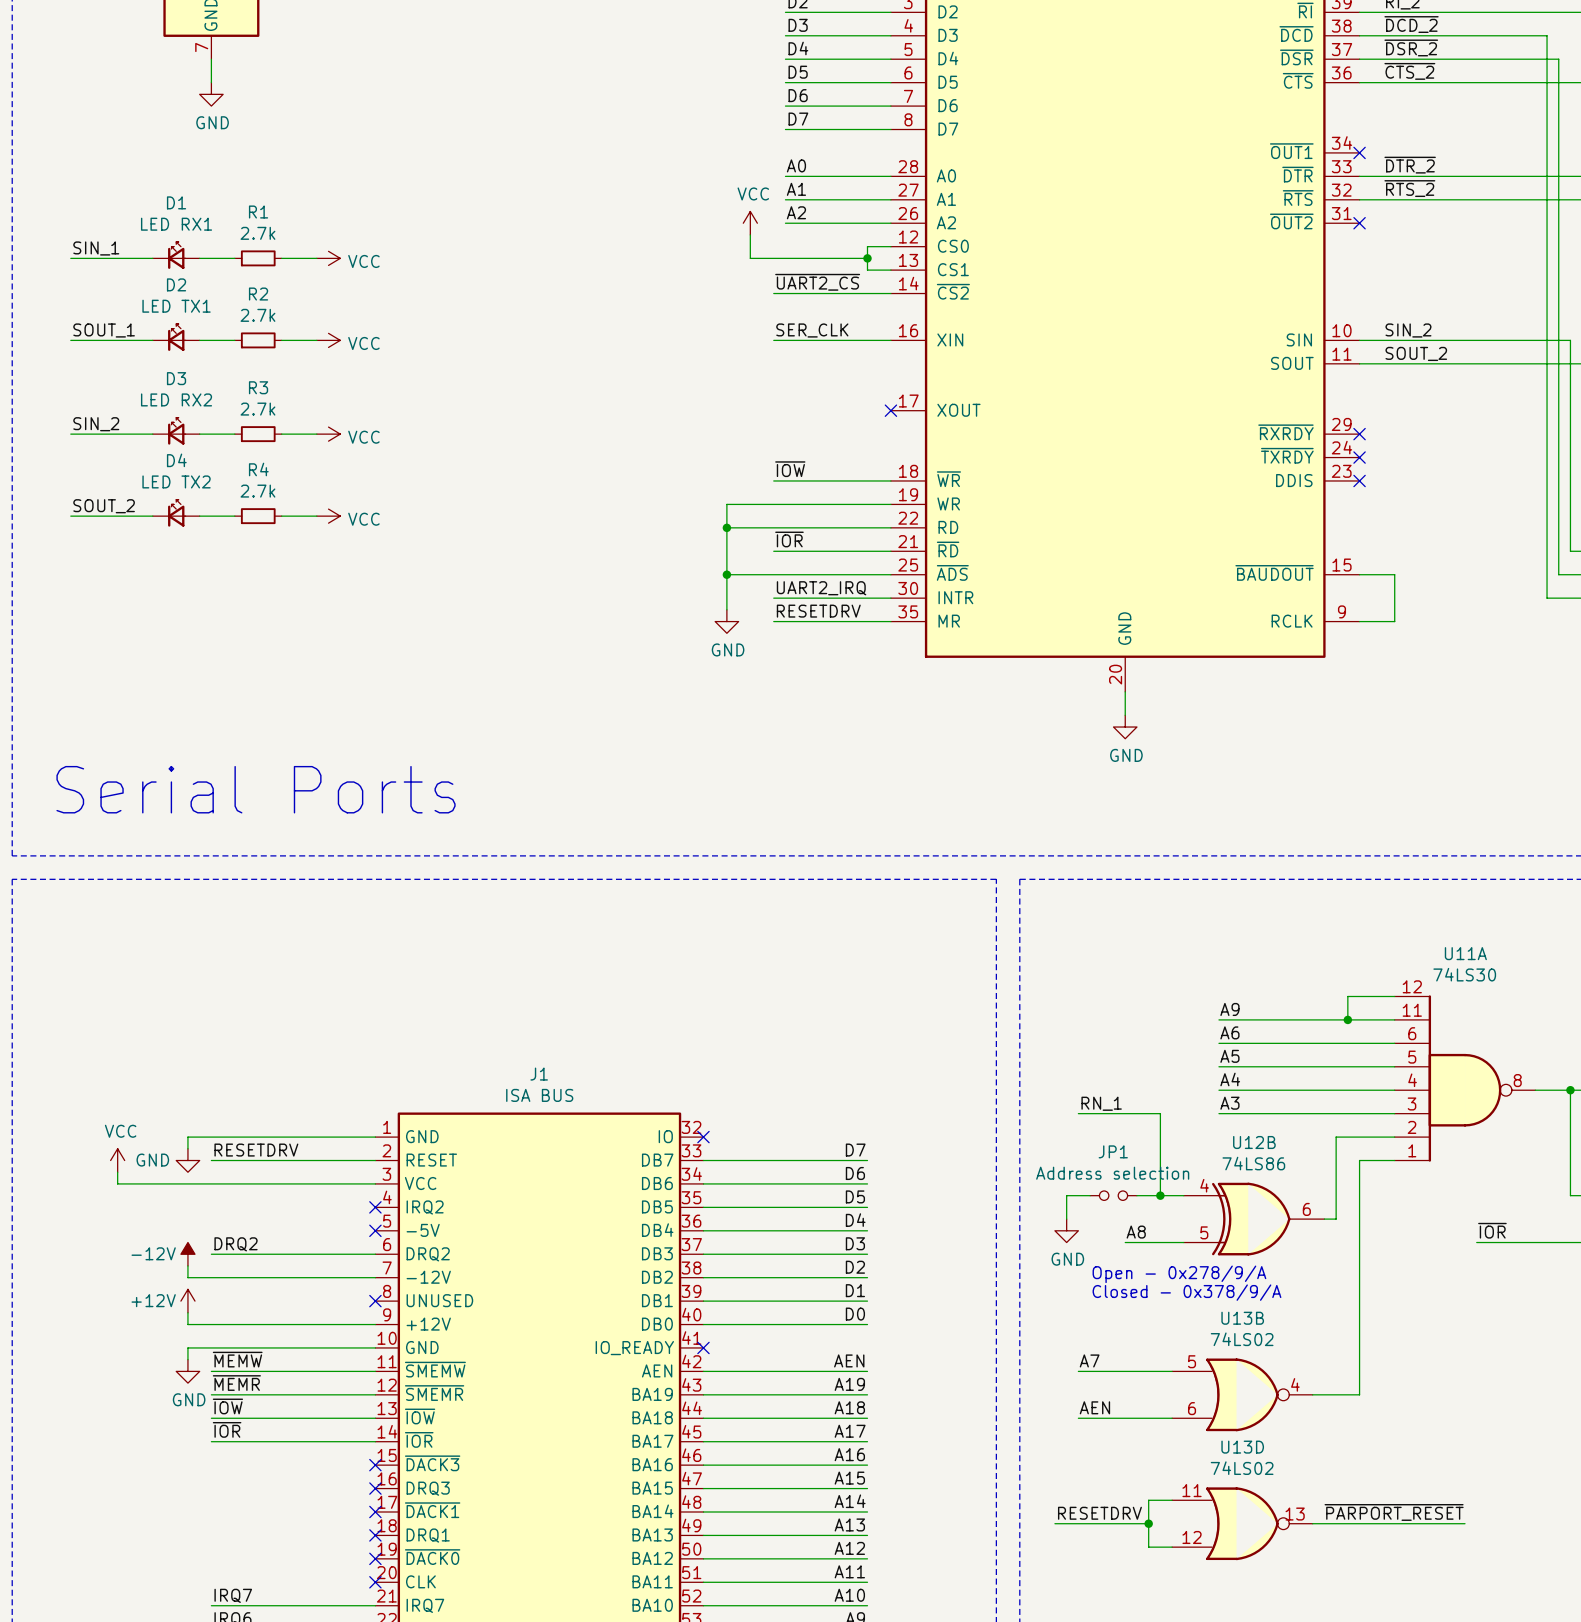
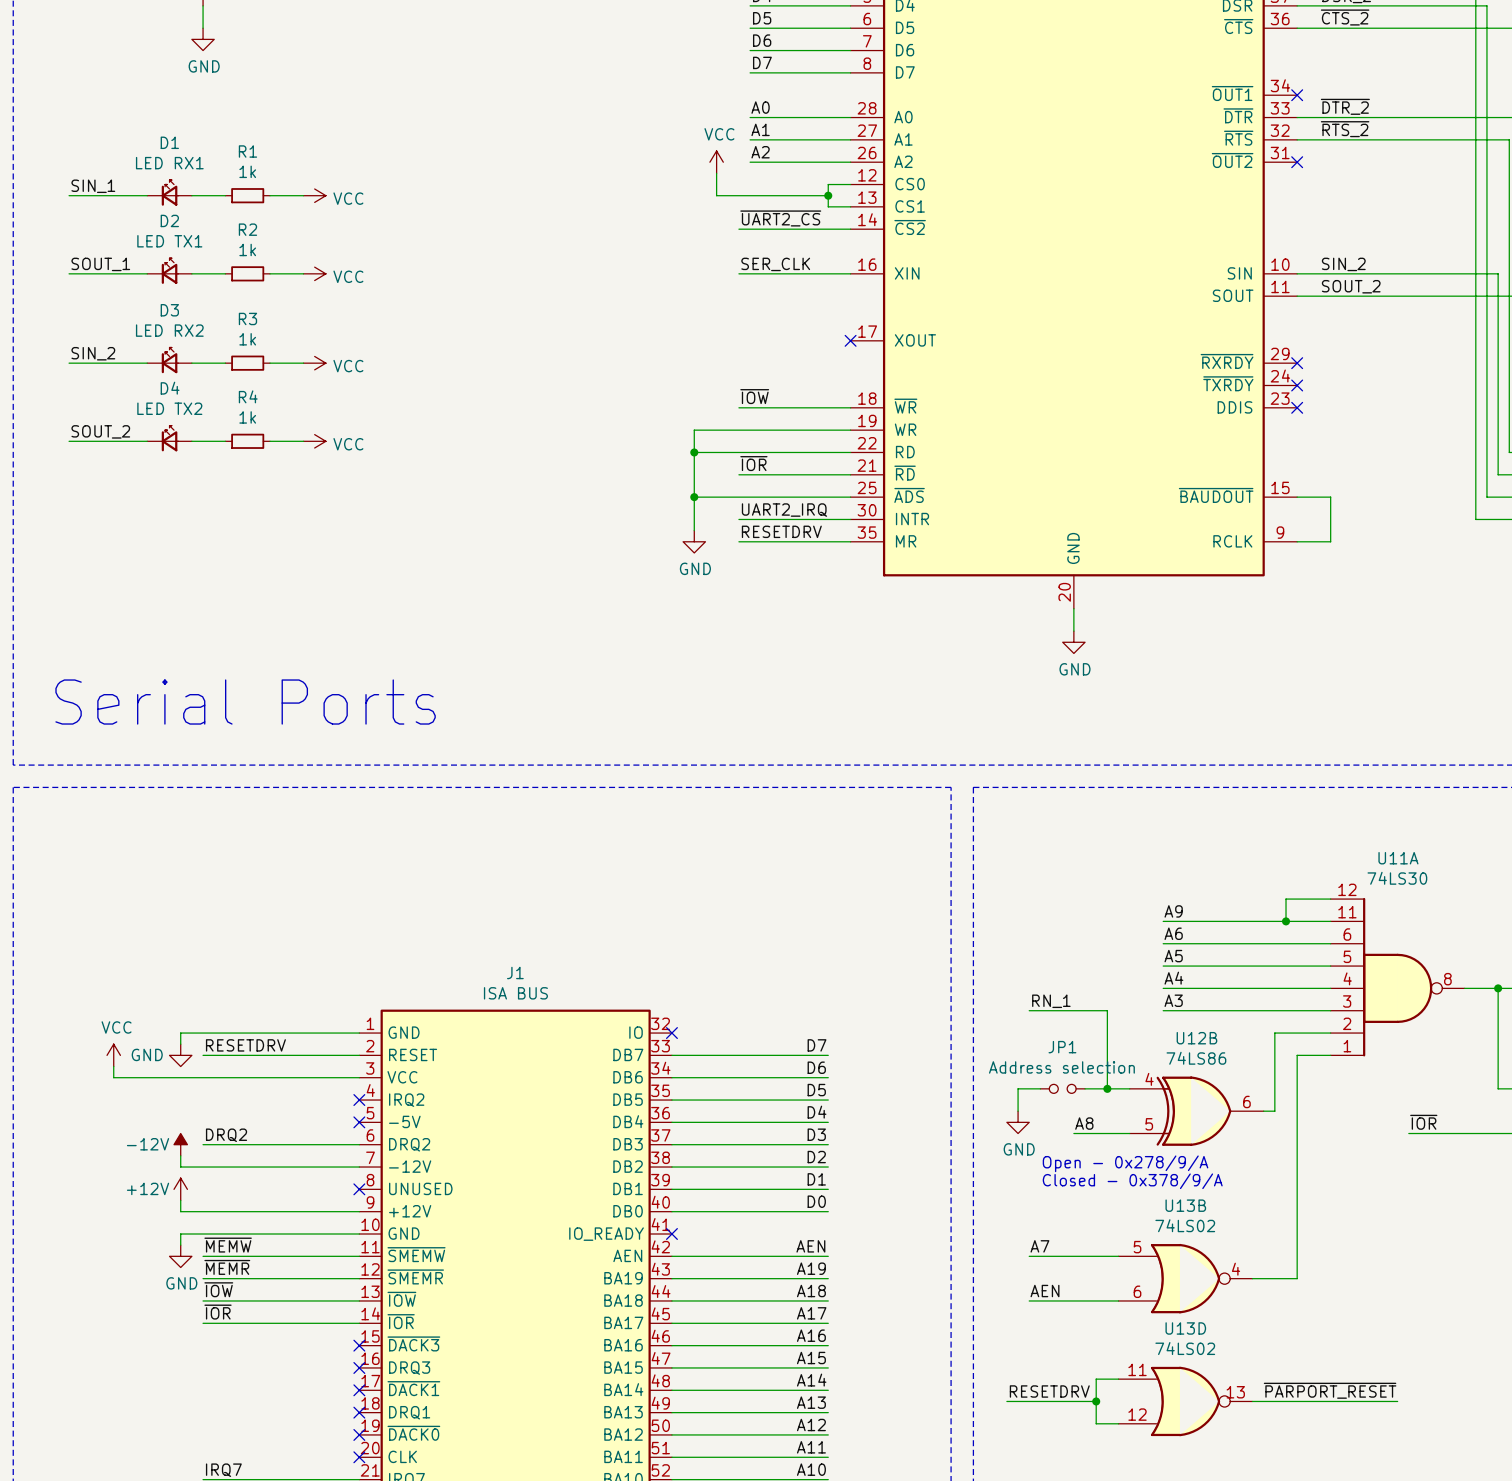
R1 value: 2.7k (257, 233) -> 1k (247, 171)
R2 value: 2.7k (257, 315) -> 1k (247, 249)
R3 value: 2.7k (257, 409) -> 1k (247, 339)
R4 value: 2.7k (257, 491) -> 1k (247, 417)

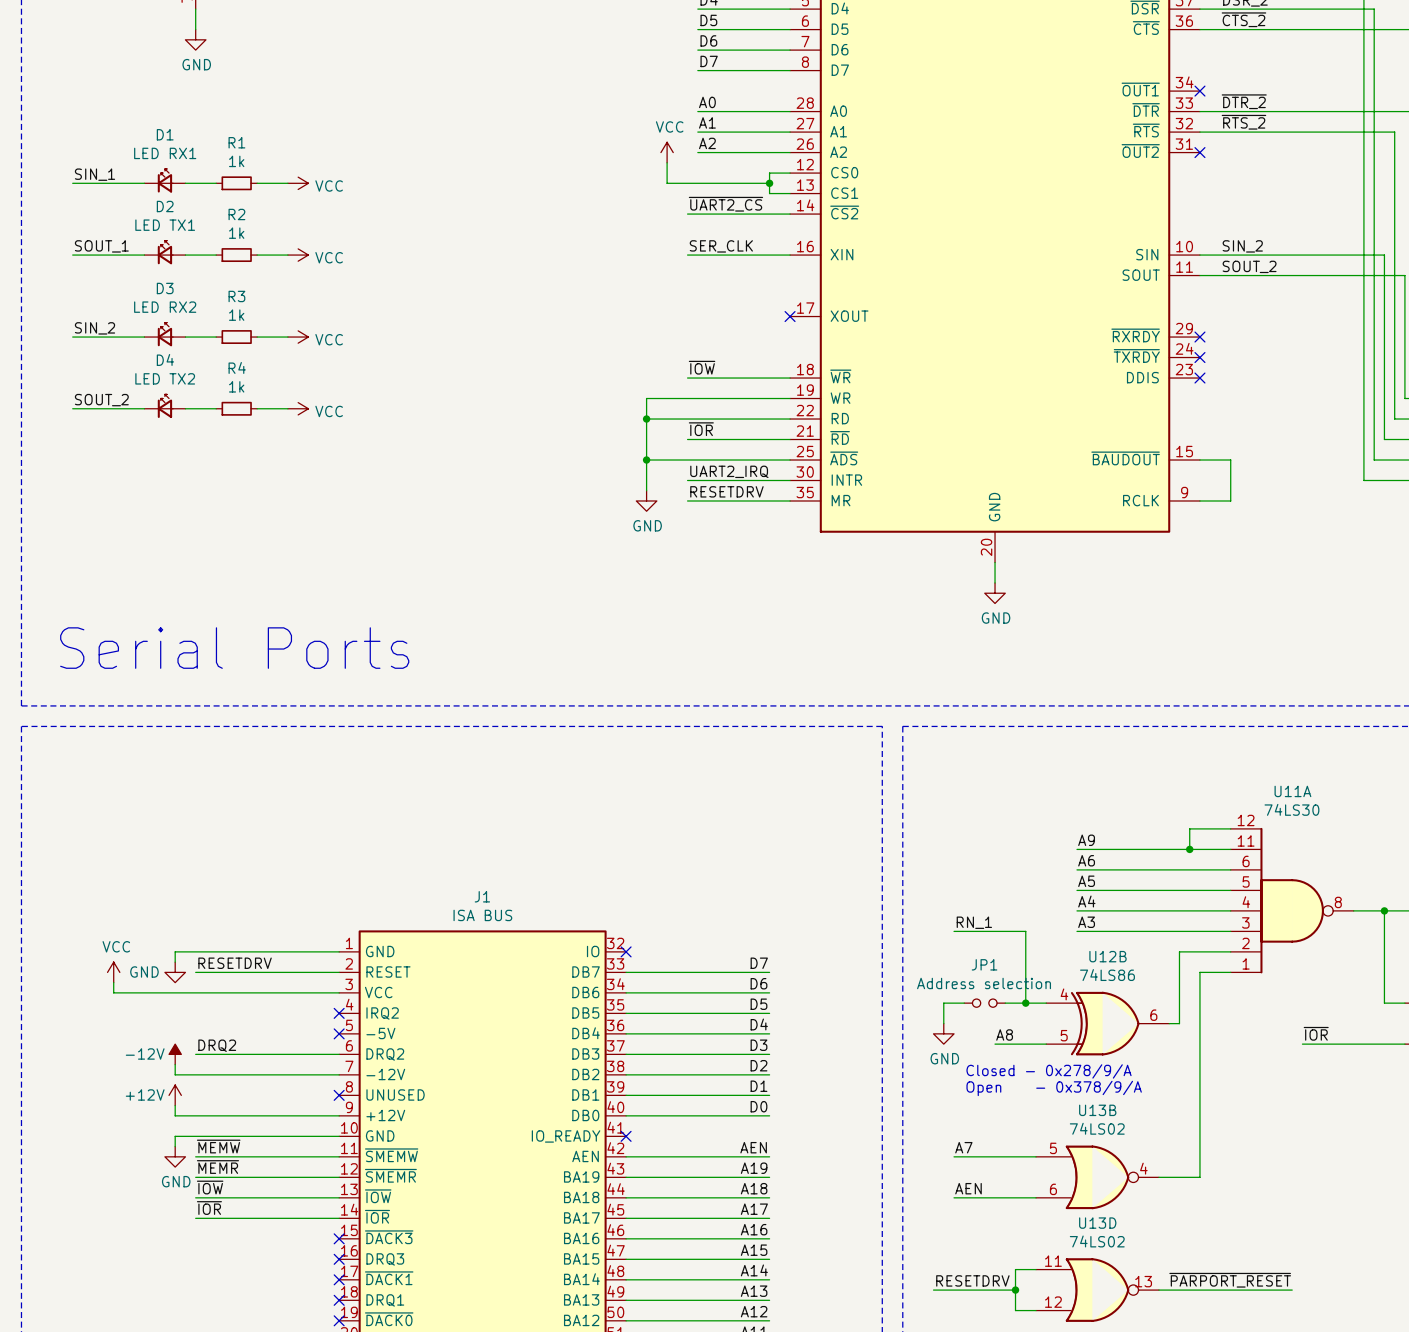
text: Open - 0x278/9/A (1125, 1163) -> Closed - 0x278/9/A (1049, 1071)
text: Closed - 0x378/9/A (1132, 1181) -> Open - 0x378/9/A (1054, 1088)

